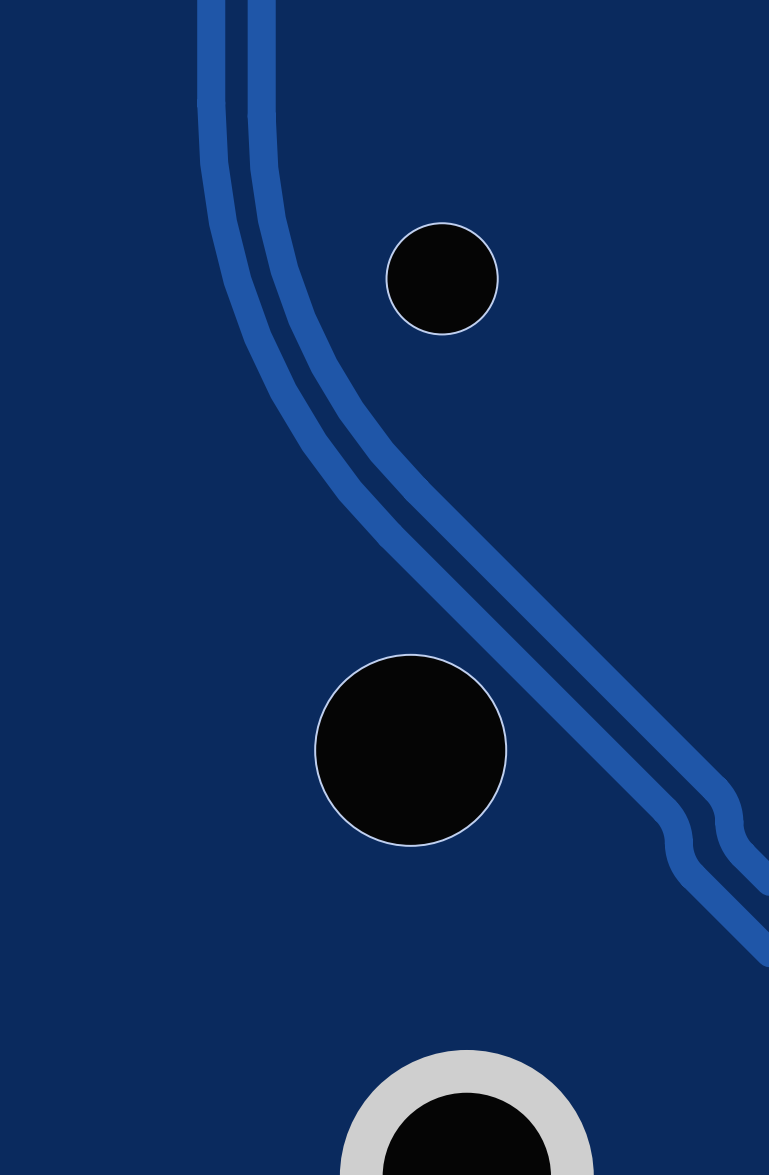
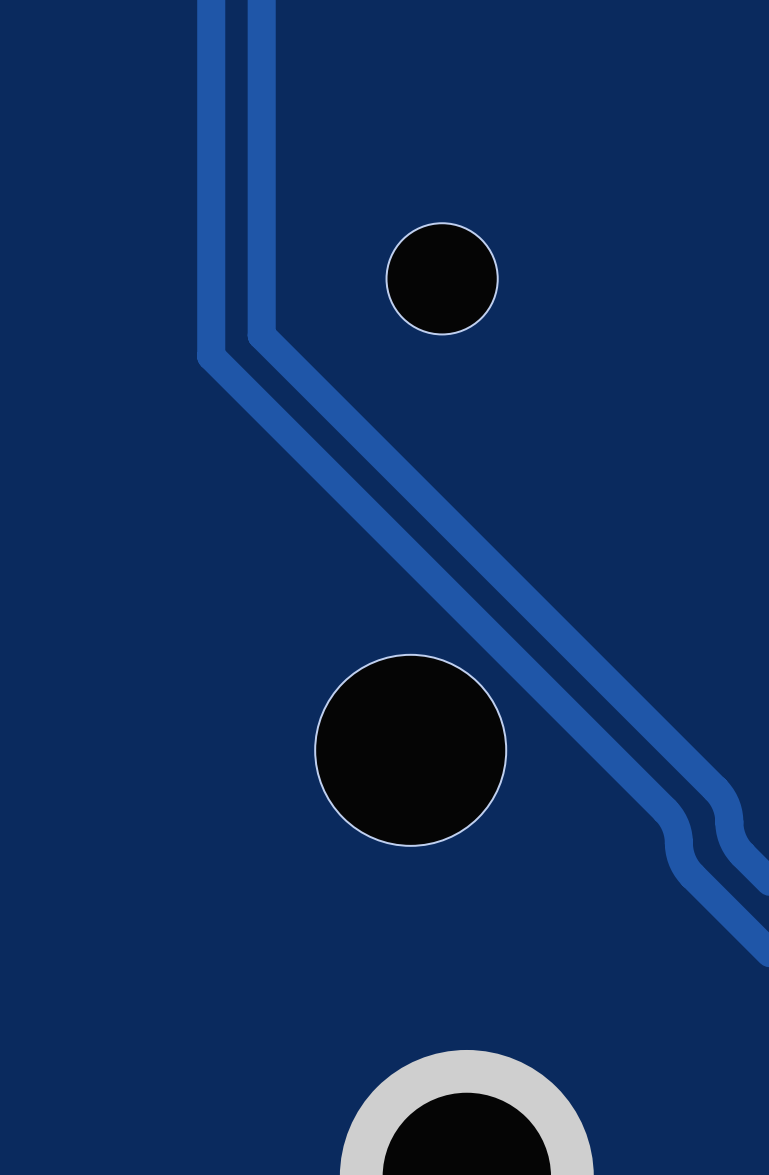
track: (211, 103) (214, 163) (222, 222) (237, 280) (257, 337) (283, 391) (314, 442) (349, 490) (390, 535) -> (211, 103) (211, 356) (390, 535)
track: (261, 116) (264, 168) (271, 219) (284, 269) (301, 318) (324, 365) (350, 410) (381, 451) (416, 490) -> (261, 116) (261, 335) (416, 490)

